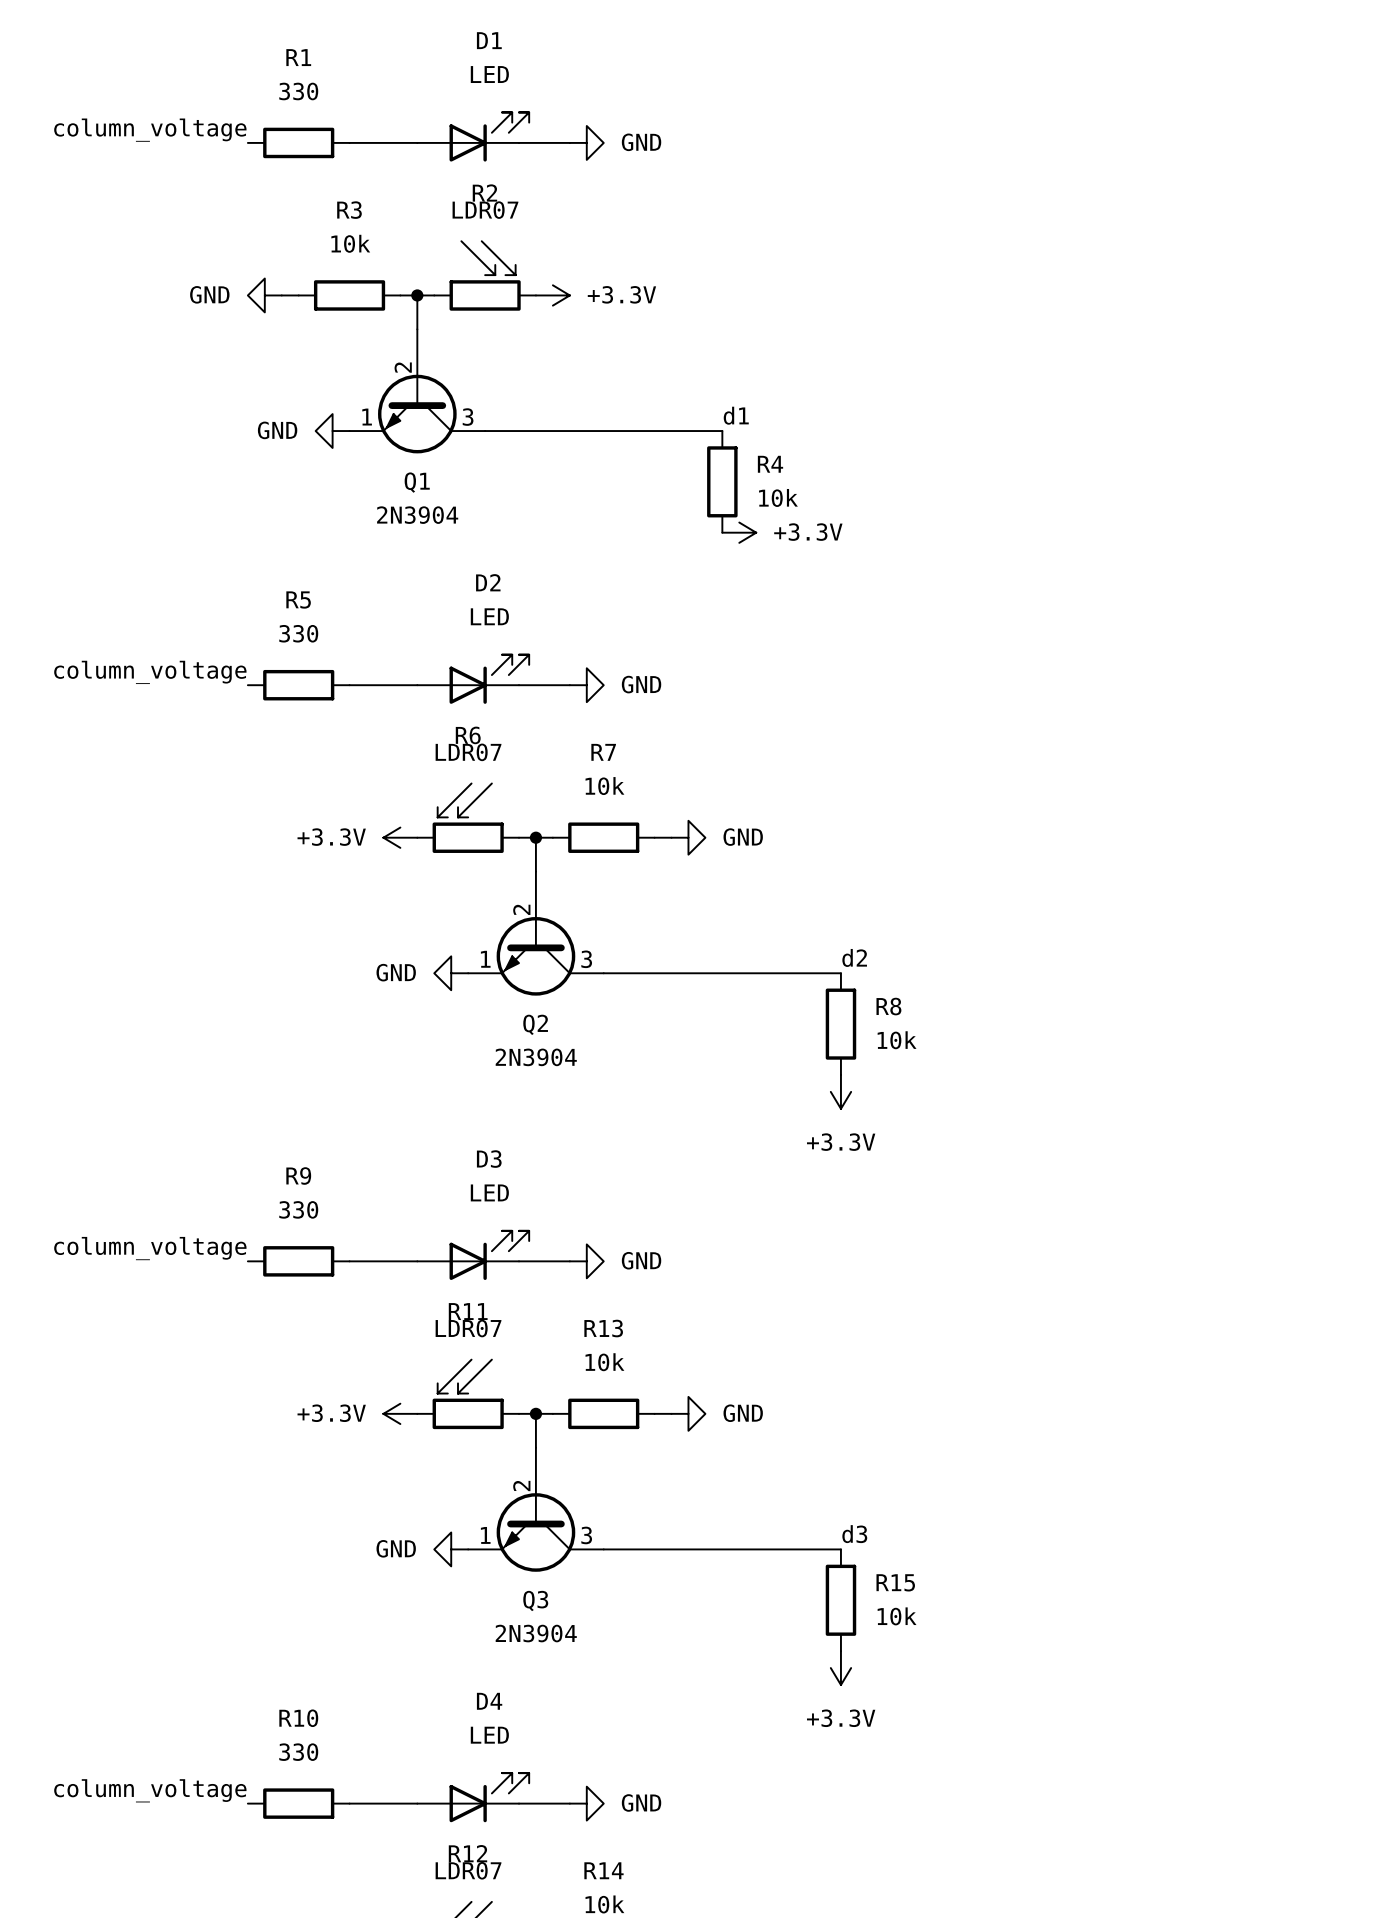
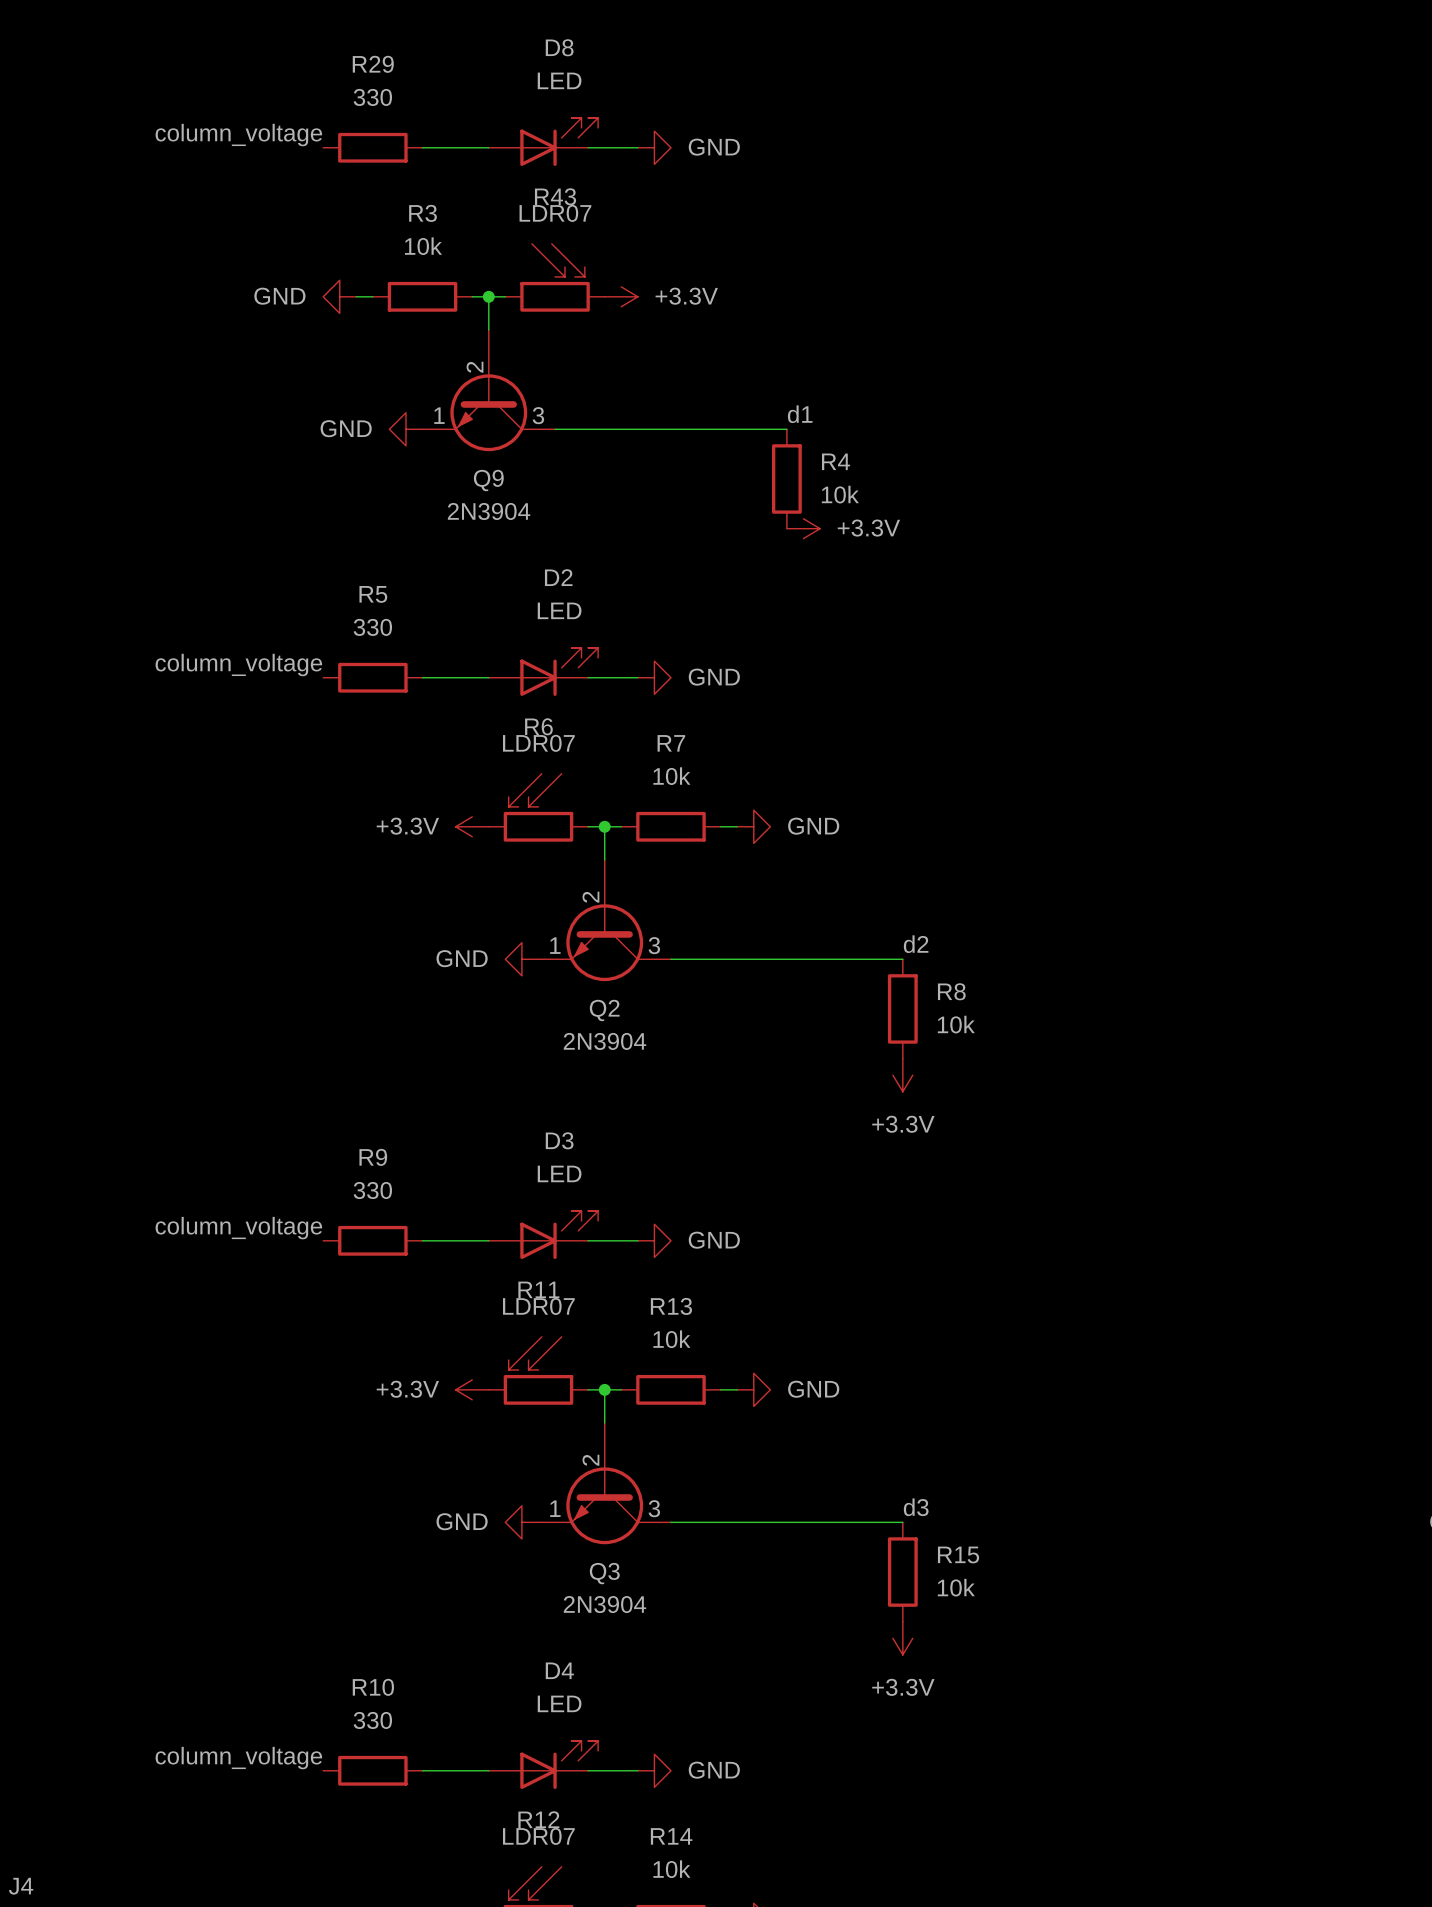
D1 name: D1 (489, 40) -> D8 (559, 47)
R1 name: R1 (298, 57) -> R29 (373, 64)
R2 name: R2 (484, 193) -> R43 (555, 196)
Q1 name: Q1 (417, 482) -> Q9 (488, 480)

